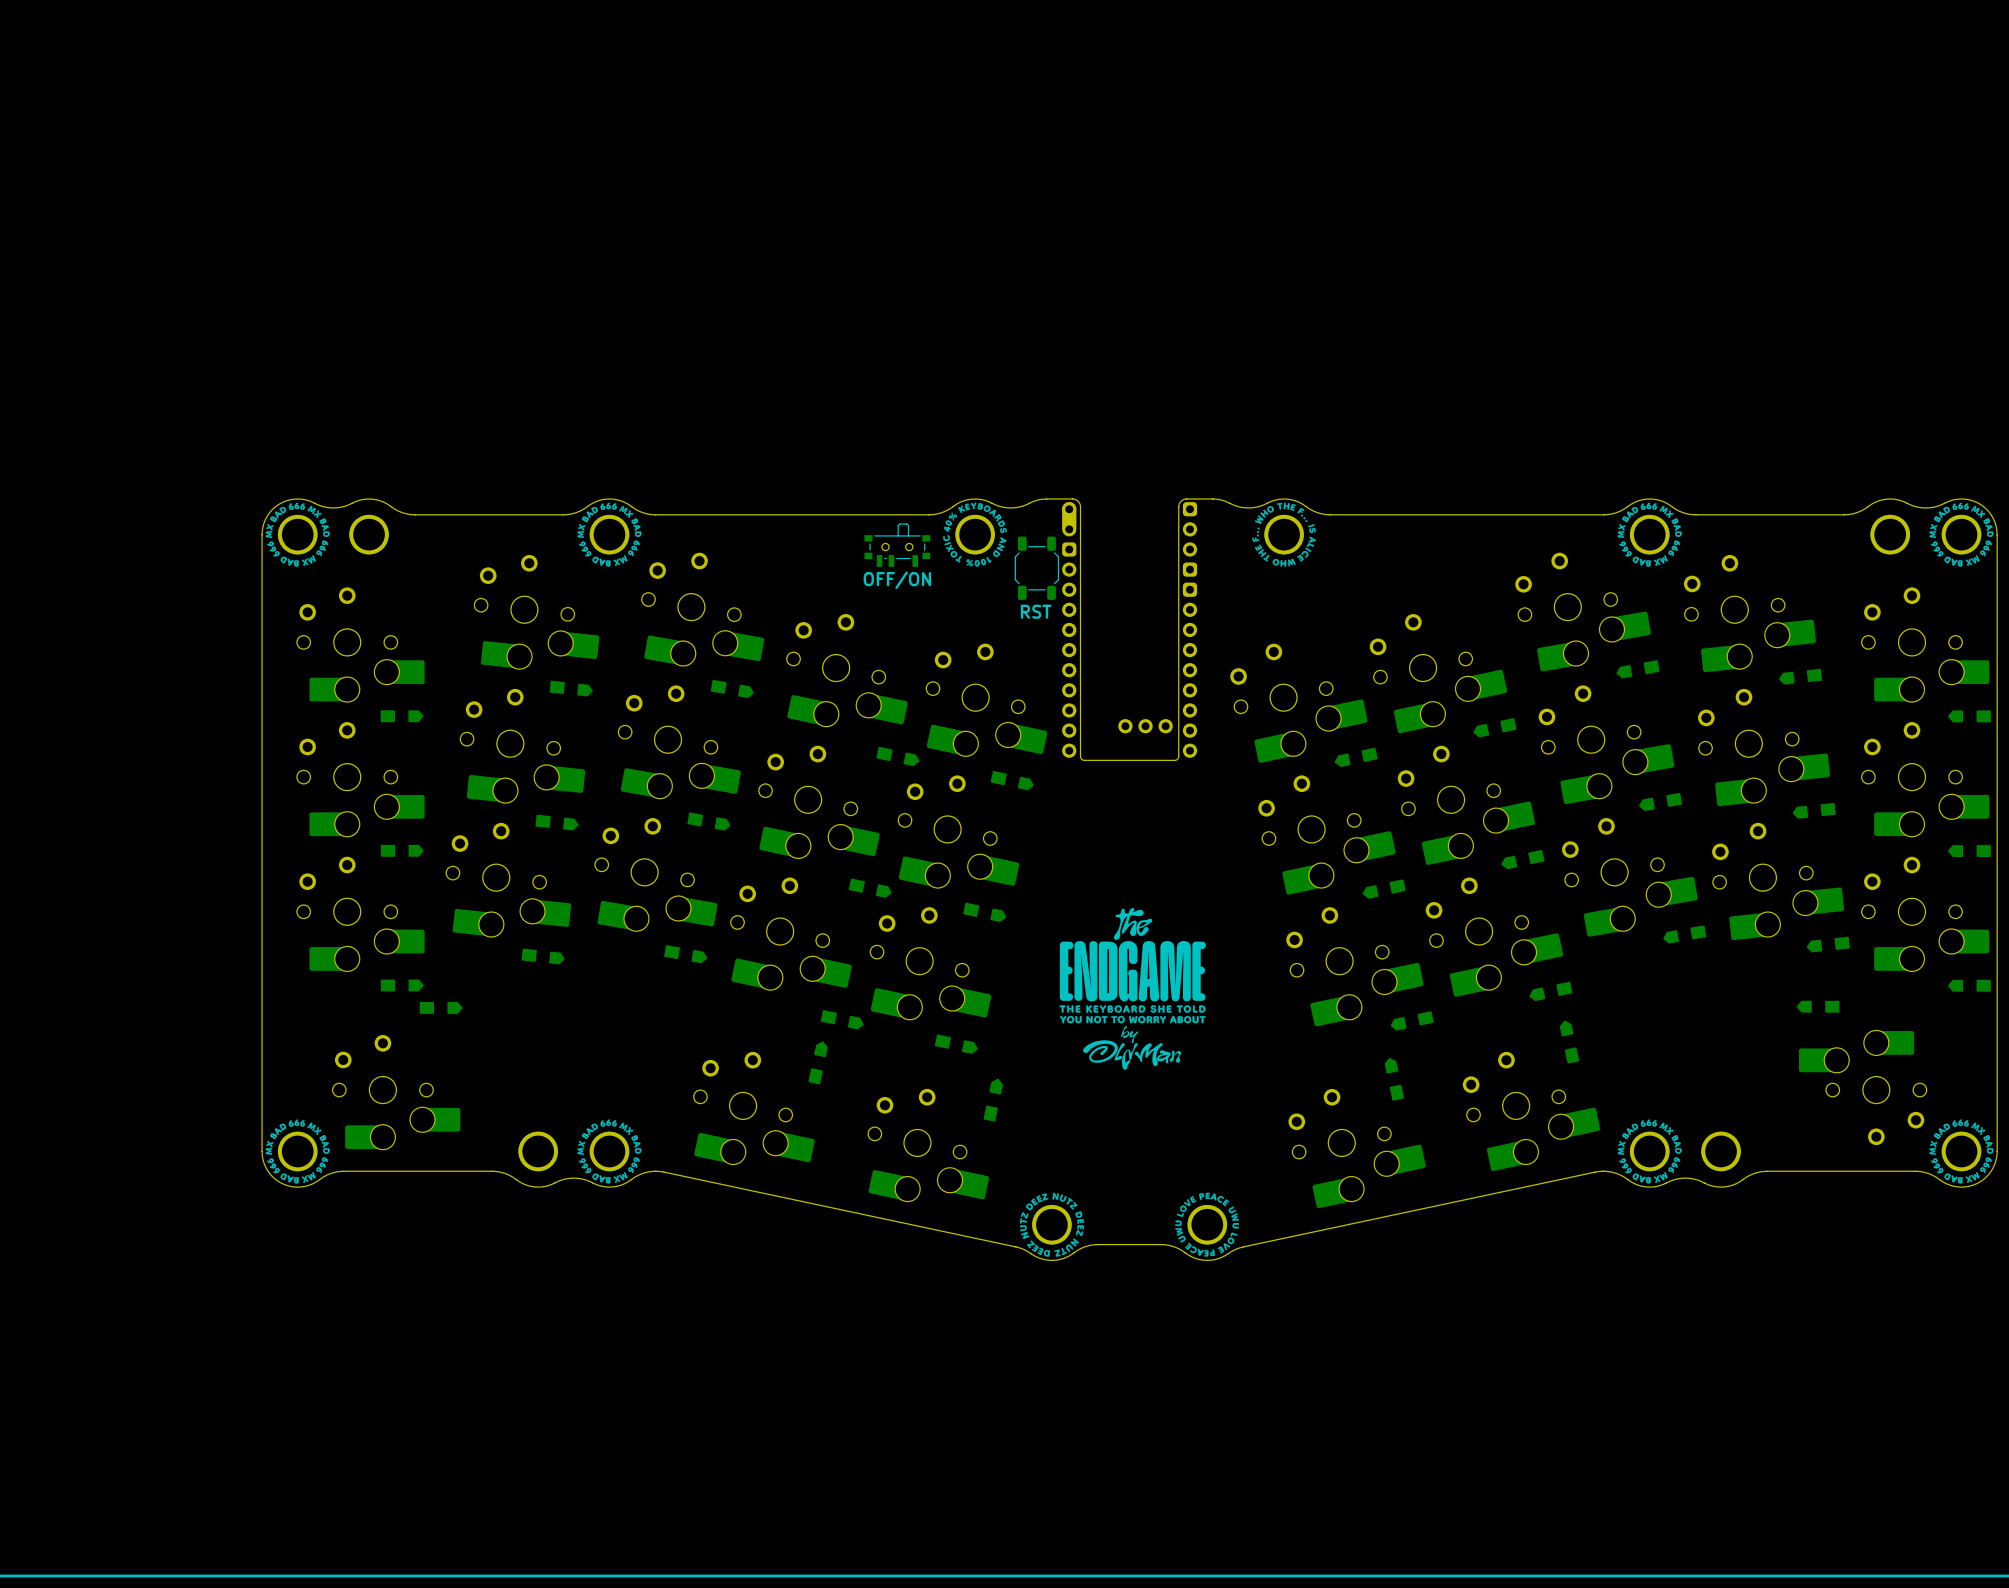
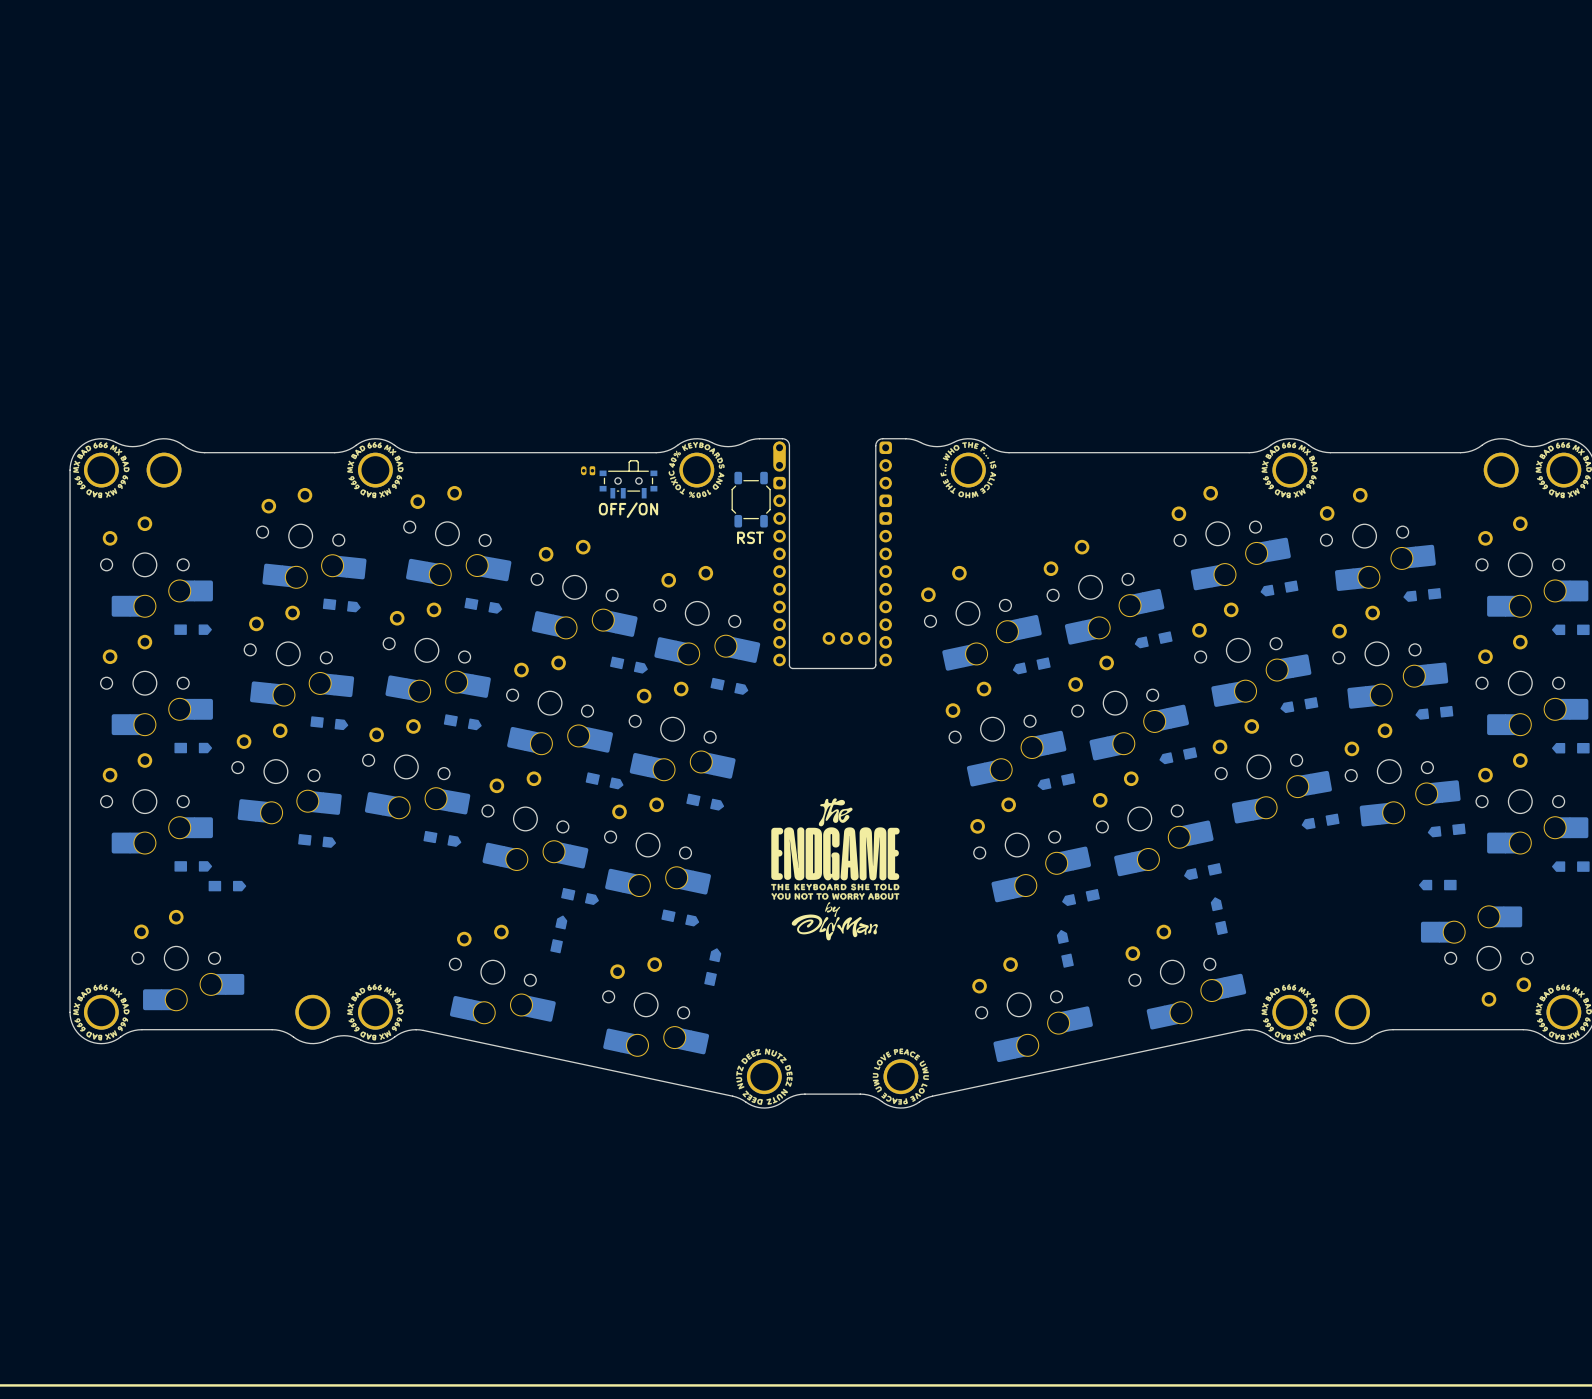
part: none -> (588, 470)

